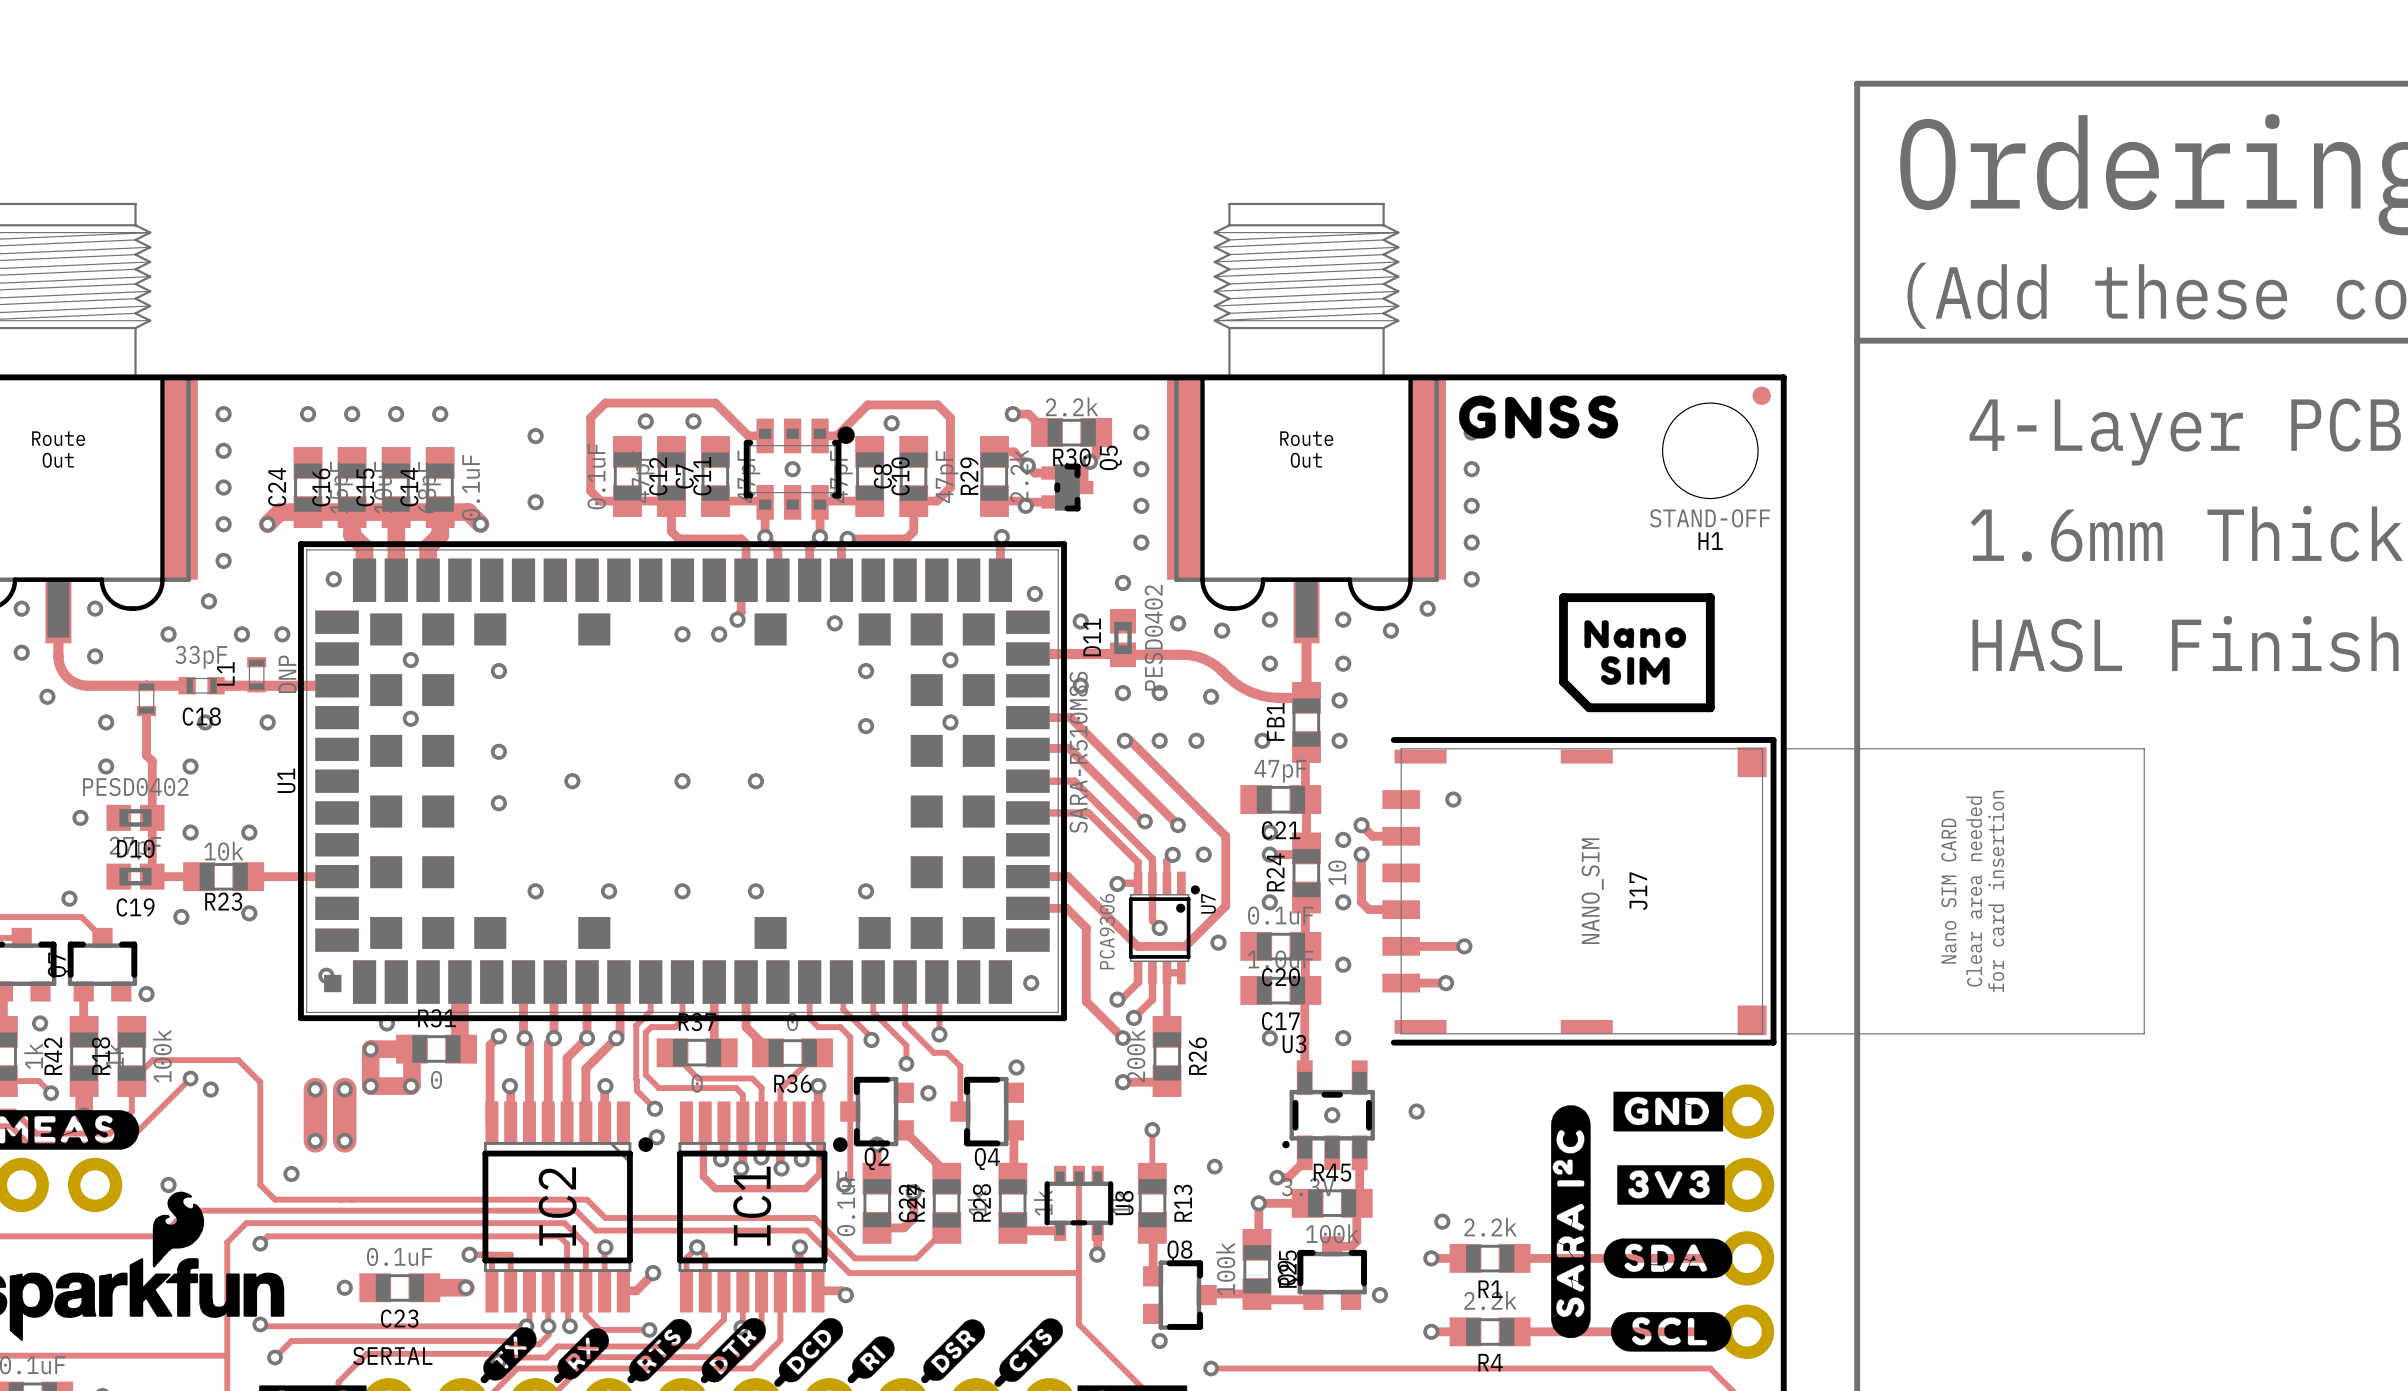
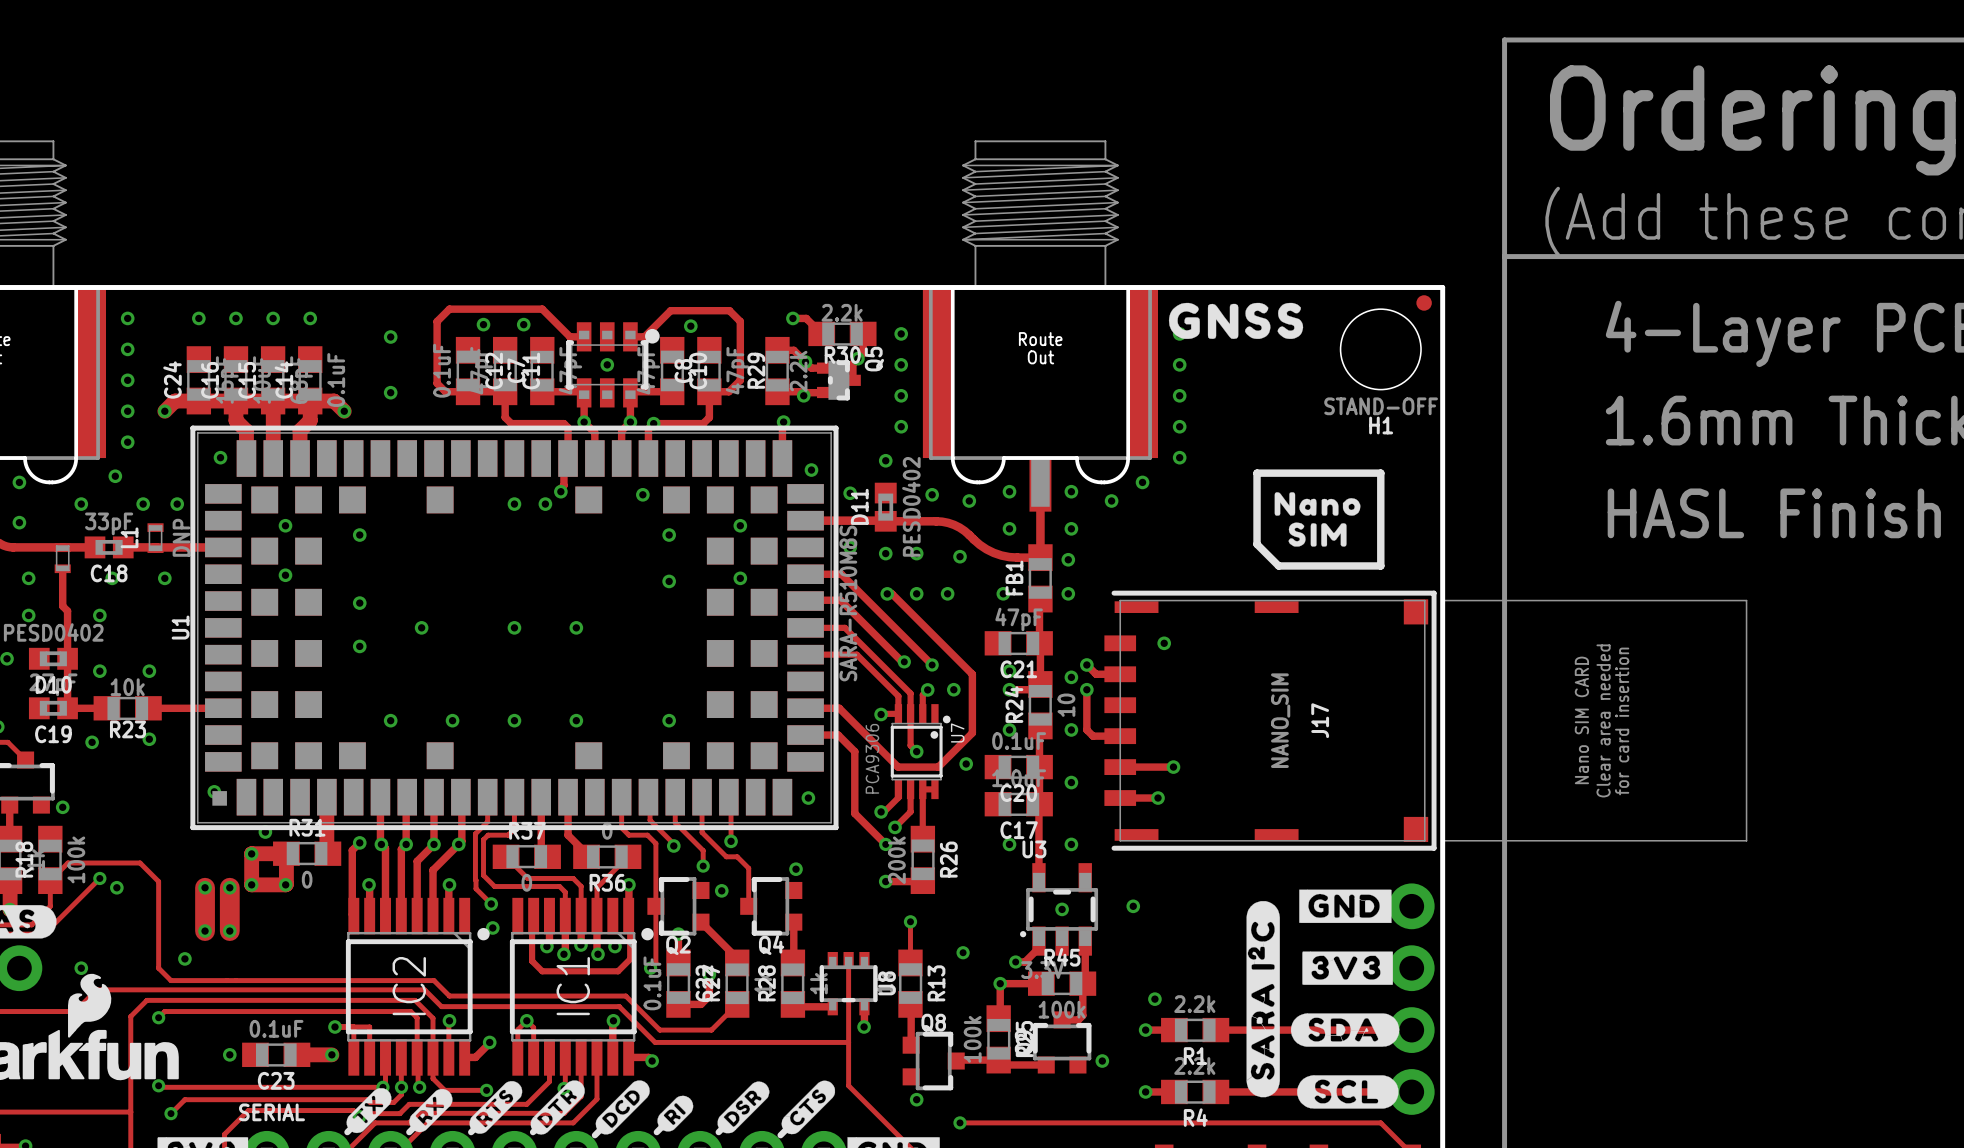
C18 footprint: [178, 677, 225, 695] -> [84, 536, 134, 559]

